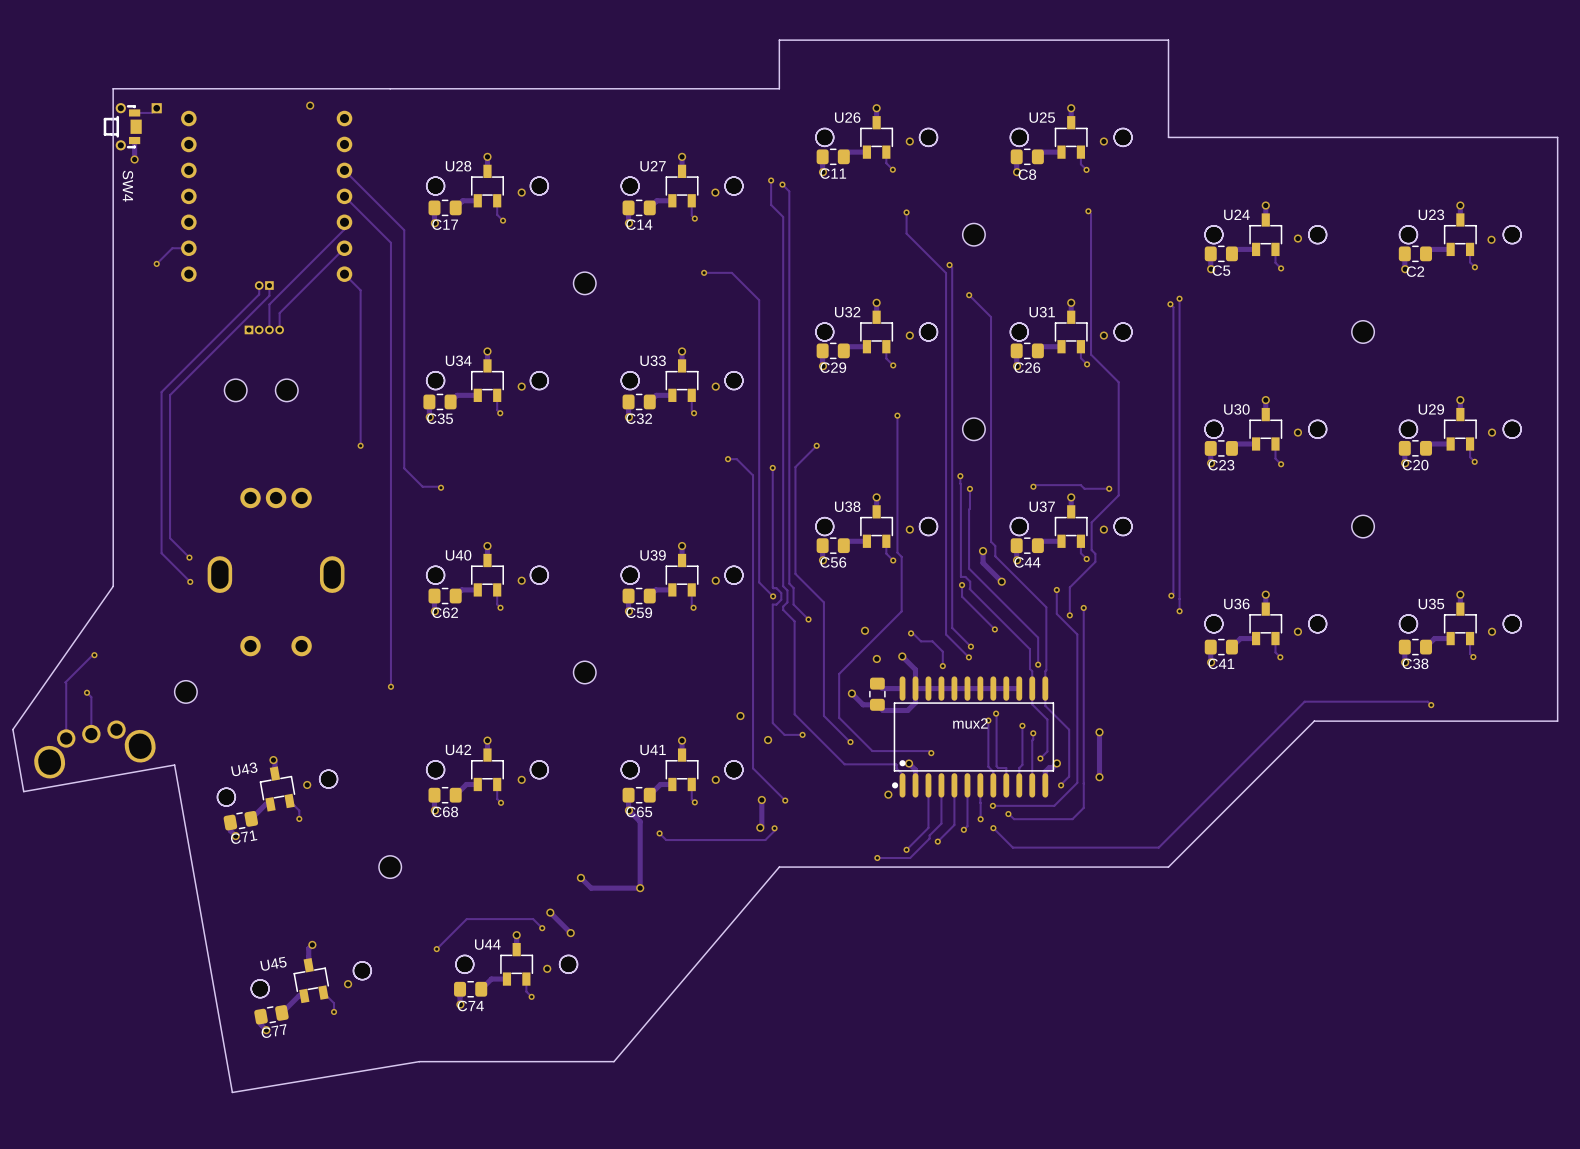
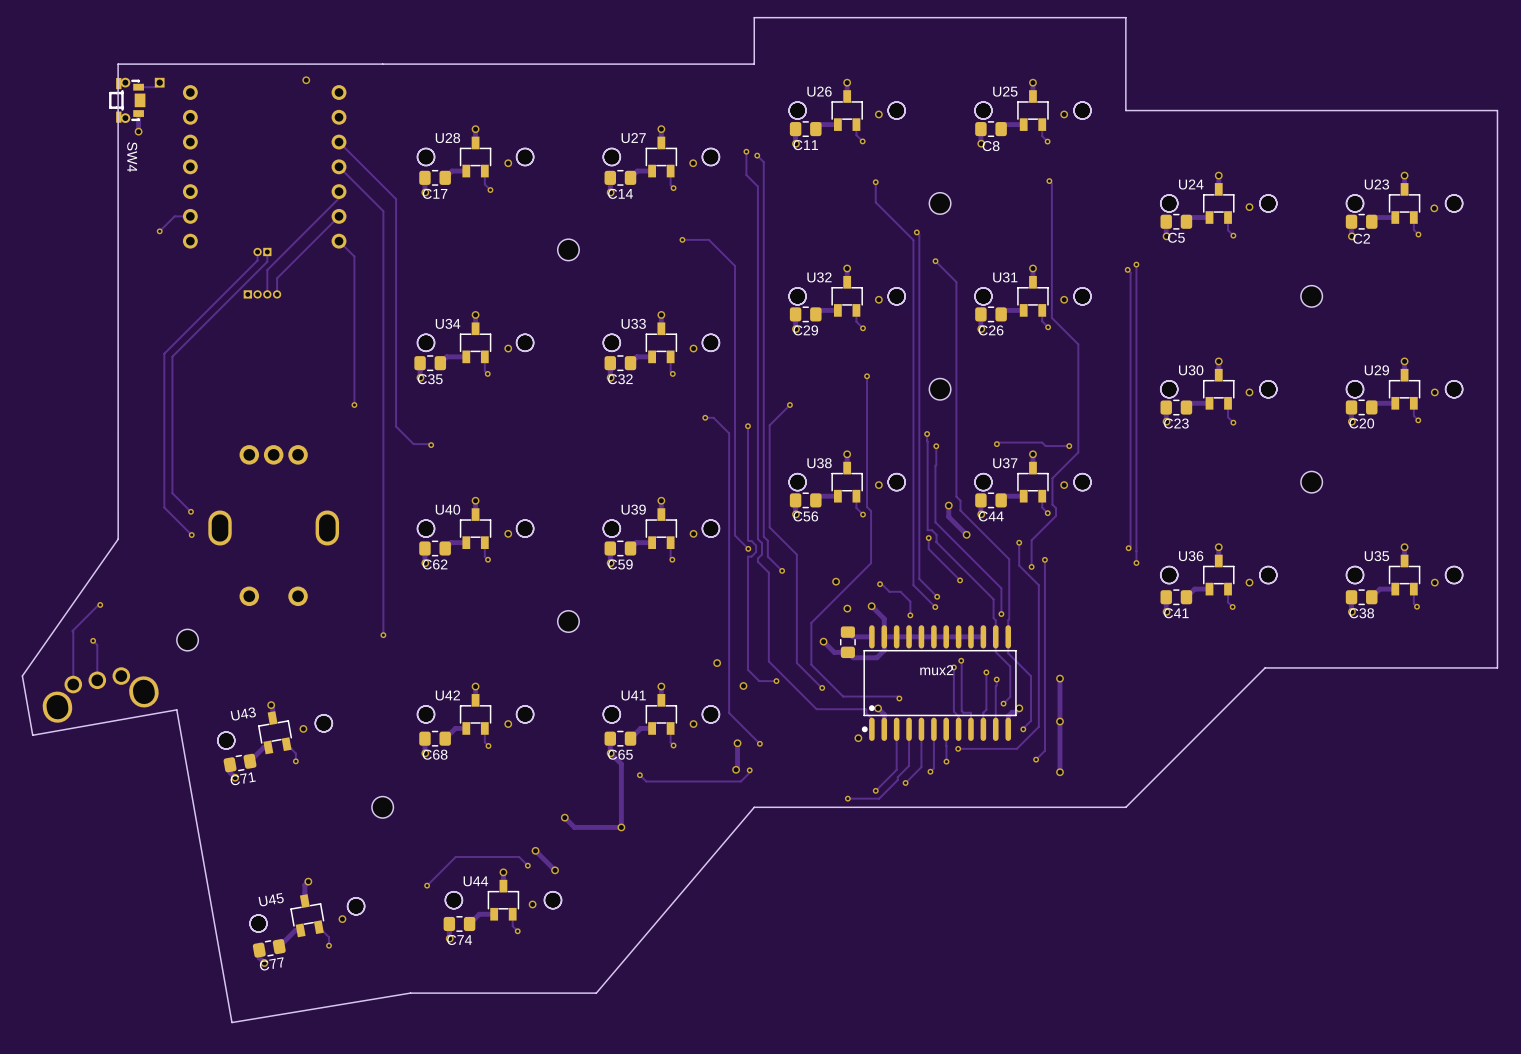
SW4 footprint: [103, 103, 142, 151] -> [109, 77, 146, 123]
part: (235, 390) -> none
part: (286, 390) -> none
track: (1431, 705) (1427, 701) (1304, 701) (1158, 847) (1012, 847) (993, 828) -> none
via: (1431, 705) -> none
track: none -> (1059, 721) (1059, 772)
track: (1008, 814) (1014, 819) (1072, 819) (1074, 817) -> none
via: (1008, 814) -> none
via: none -> (1036, 759)
via: (993, 828) -> none
via: none -> (1059, 772)

